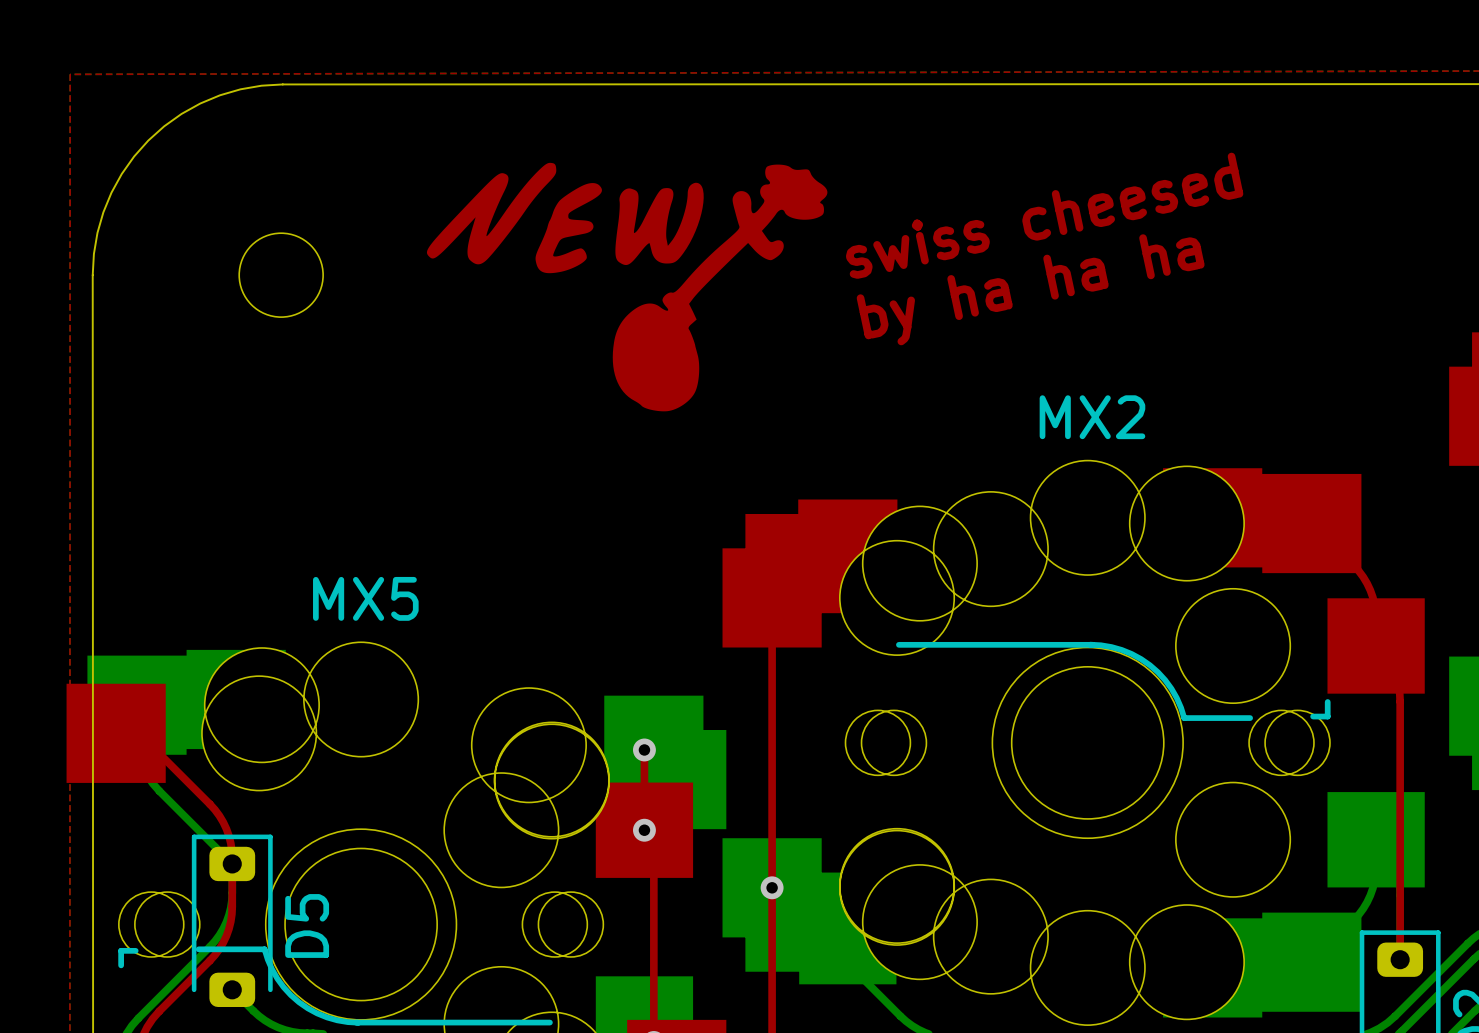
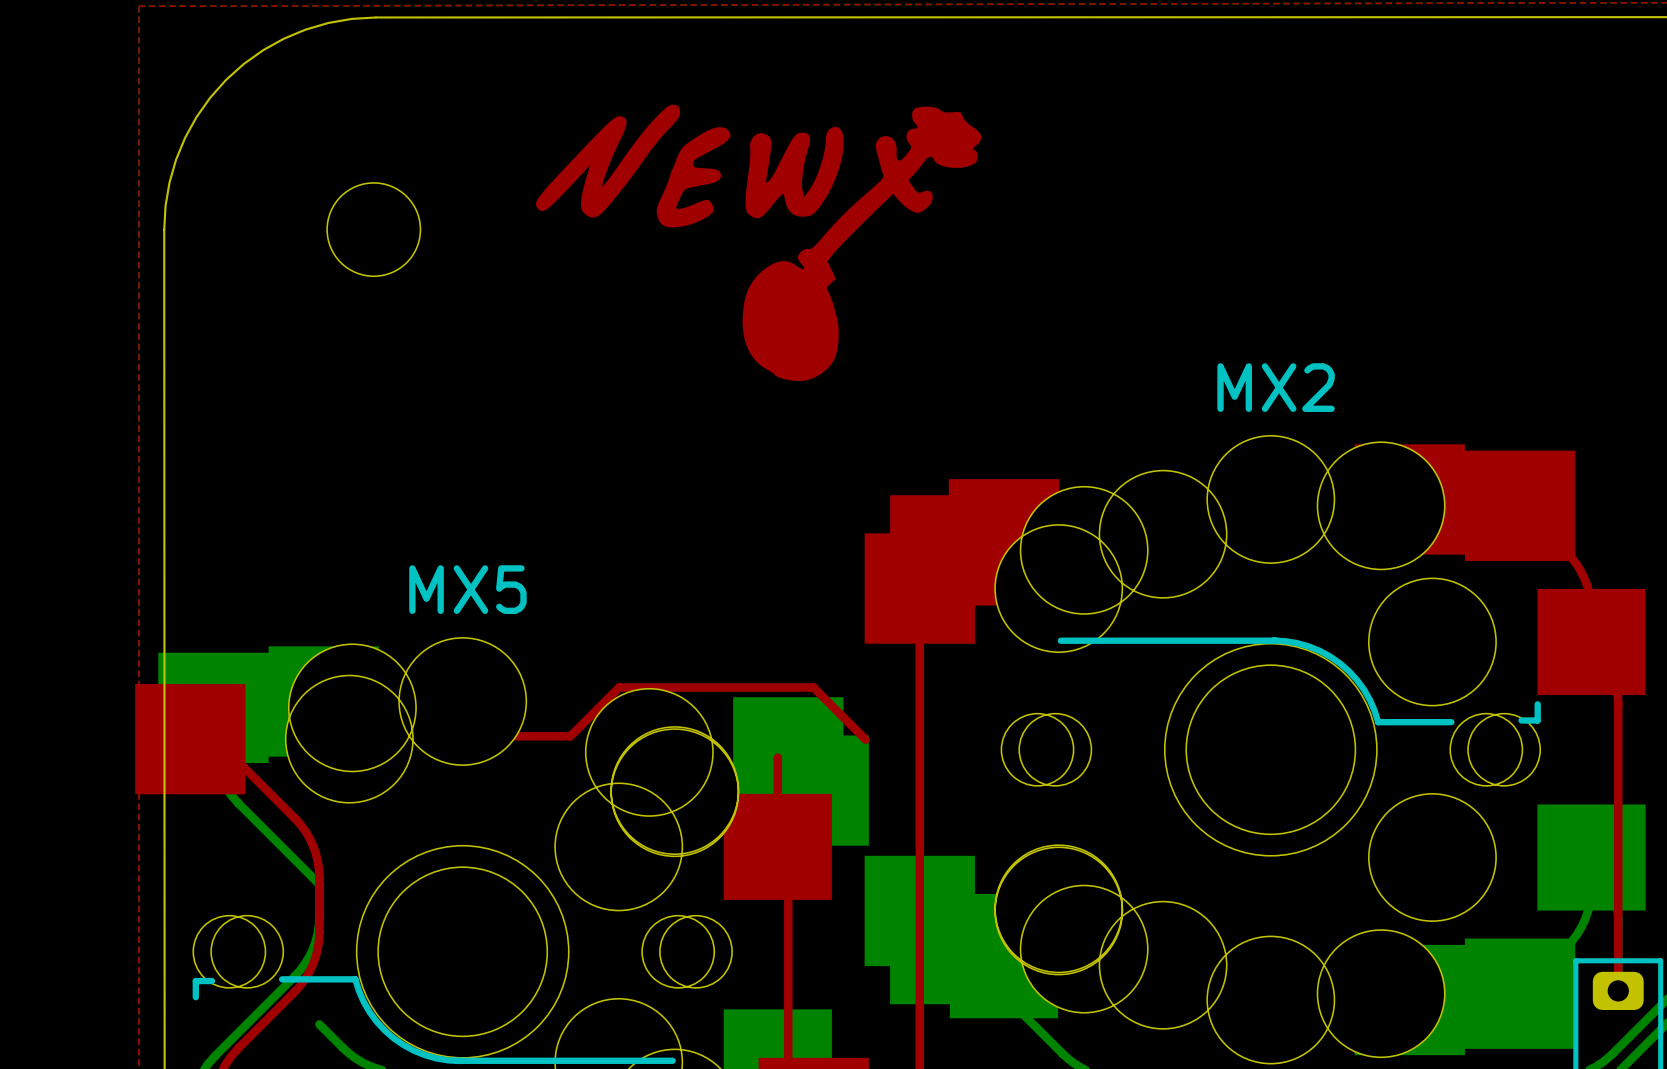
text: swiss cheesed (1044, 215) -> none
text: by ha ha ha (1030, 289) -> none
top track: none -> (354, 736) (427, 736) (462, 701) (497, 736) (570, 736) (619, 687) (813, 687) (865, 739)
via: (644, 749) -> none
via: (644, 830) -> none
via: (772, 887) -> none
D5: (232, 920) -> none

